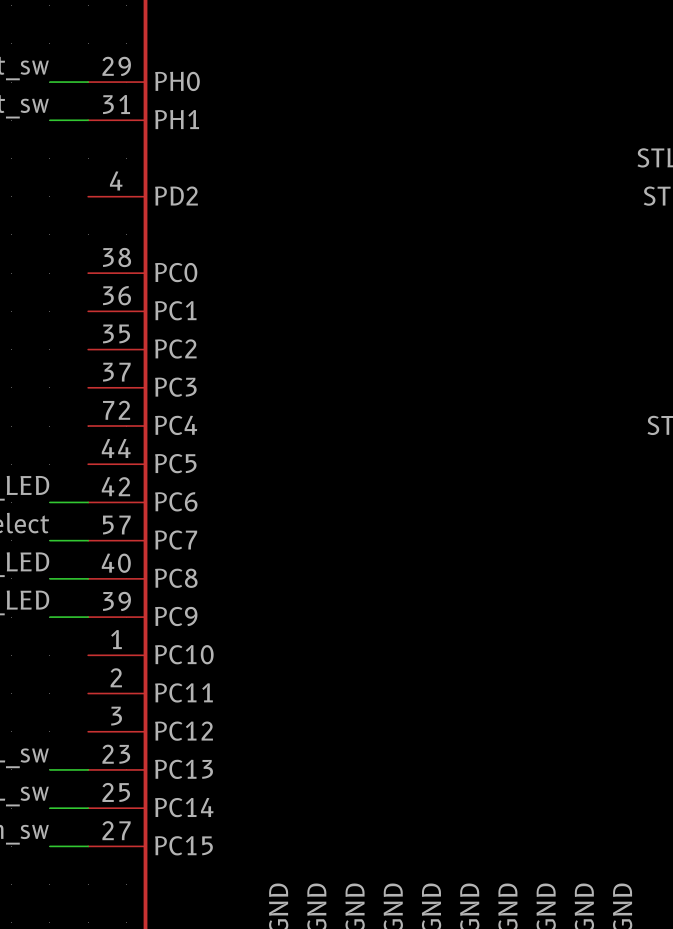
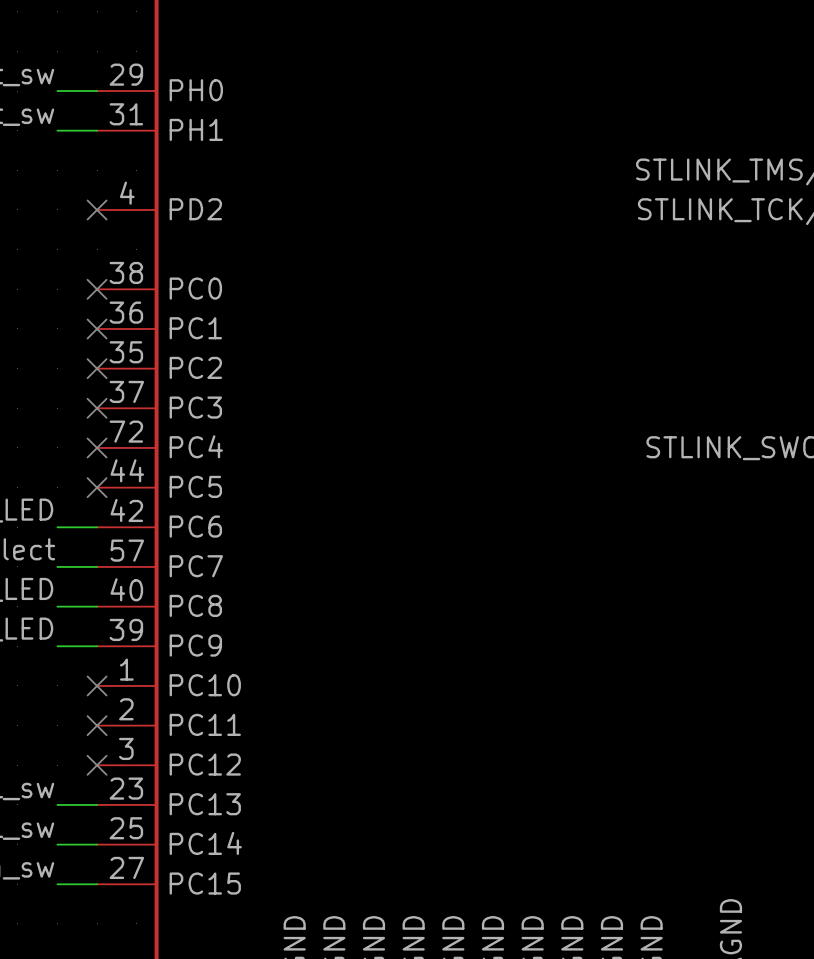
no-connect mark: none -> (97, 209)
no-connect mark: none -> (97, 289)
no-connect mark: none -> (97, 328)
no-connect mark: none -> (97, 368)
no-connect mark: none -> (97, 408)
no-connect mark: none -> (97, 447)
no-connect mark: none -> (97, 487)
no-connect mark: none -> (97, 685)
no-connect mark: none -> (97, 725)
no-connect mark: none -> (97, 765)

